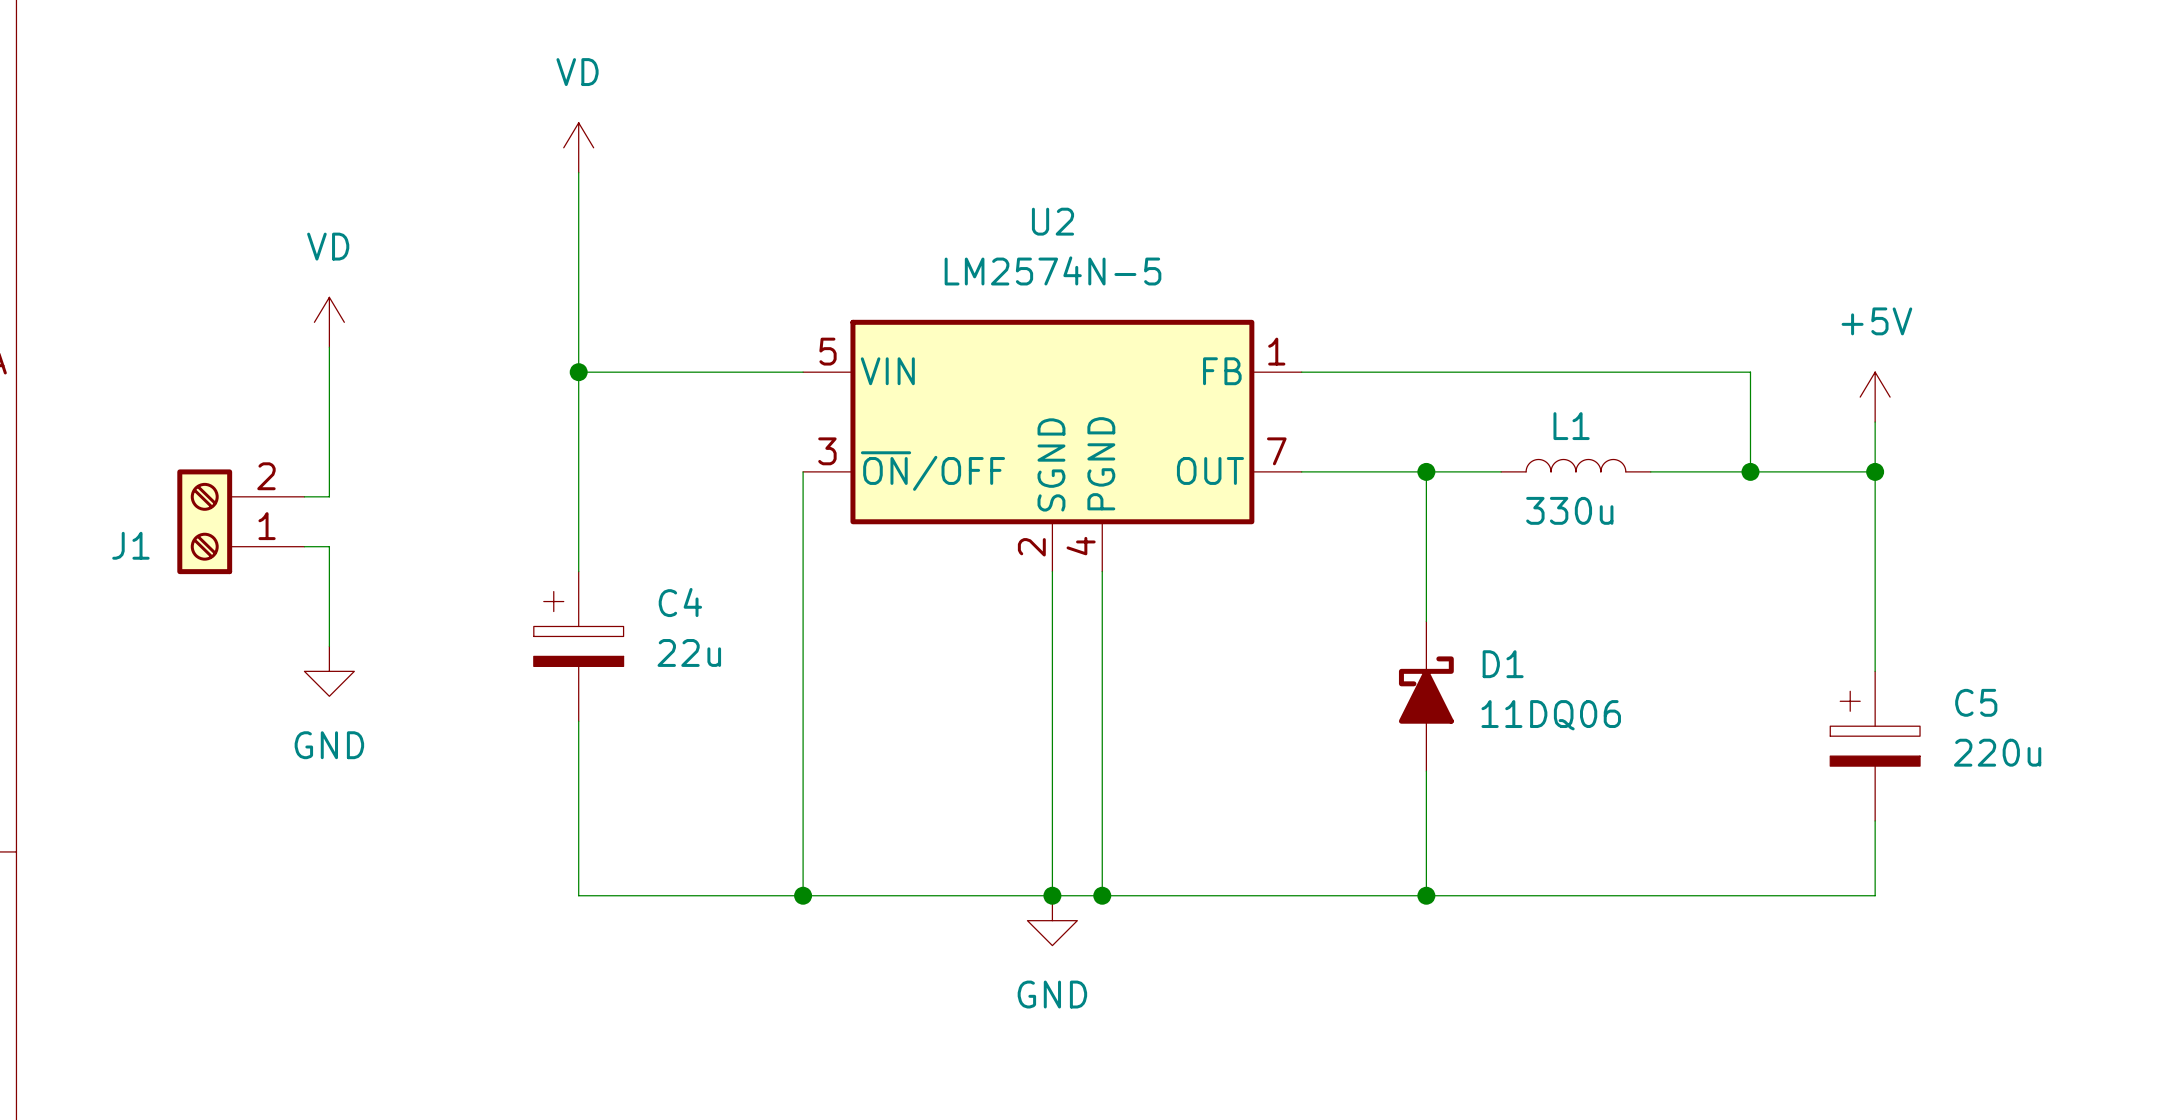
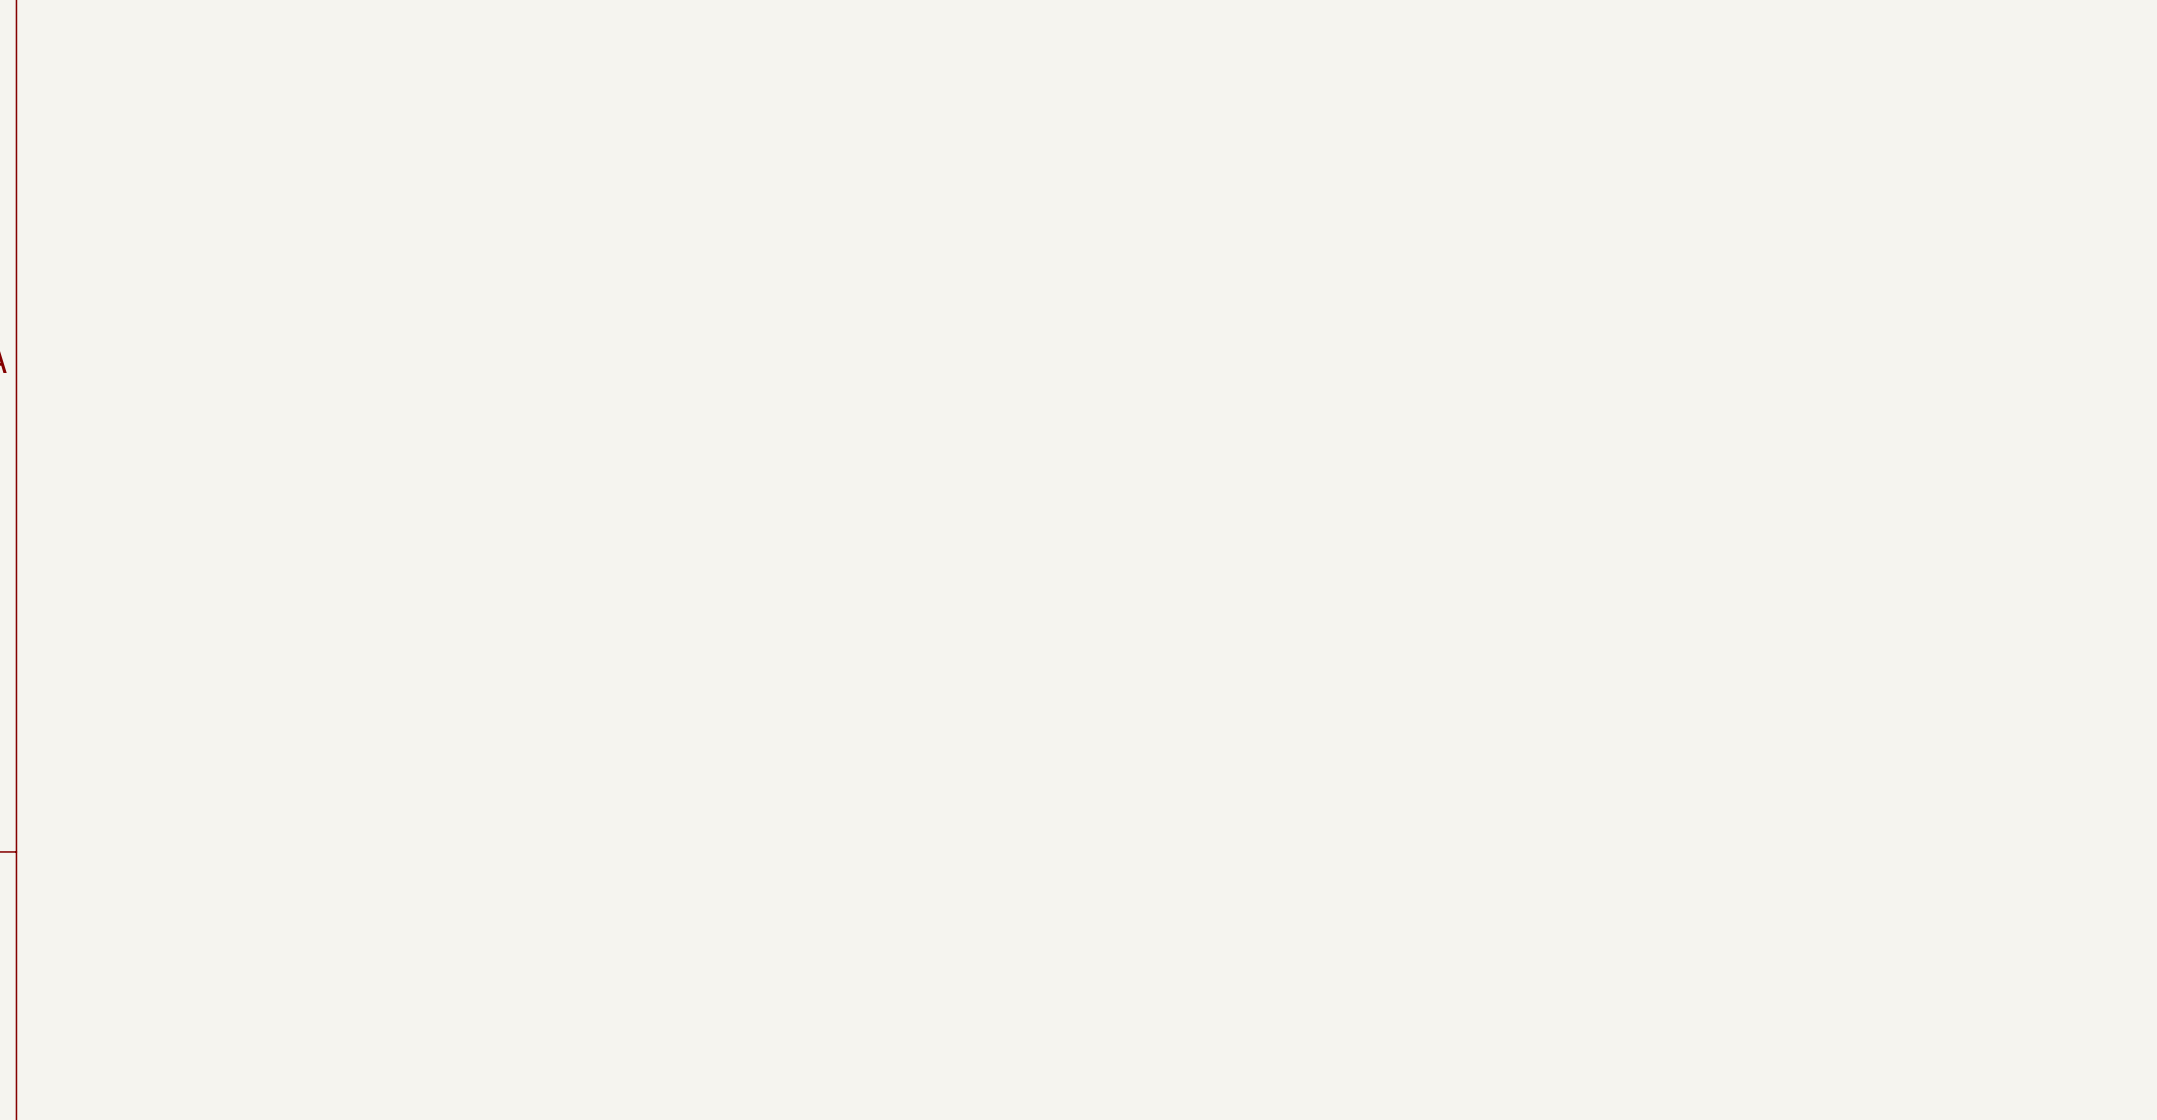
power symbol: VD (578, 147) -> none
wire: (578, 172) (578, 571) -> none
power symbol: VD (329, 322) -> none
wire: (329, 347) (329, 496) (304, 496) -> none
wire: (578, 372) (803, 372) -> none
junction: (578, 372) -> none
wire: (1301, 372) (1750, 372) (1750, 471) -> none
power symbol: +5V (1875, 397) -> none
wire: (1875, 422) (1875, 671) -> none
U2: LM2574N-5 (1052, 445) -> none
L1: 330u (1575, 465) -> none
wire: (803, 471) (803, 895) -> none
wire: (1301, 471) (1501, 471) -> none
wire: (1426, 471) (1426, 621) -> none
junction: (1426, 471) -> none
wire: (1650, 471) (1875, 471) -> none
junction: (1750, 471) -> none
junction: (1875, 471) -> none
J1: (240, 521) -> none
wire: (304, 546) (329, 546) (329, 646) -> none
wire: (1052, 571) (1052, 895) -> none
wire: (1102, 571) (1102, 895) -> none
C4: 22u (578, 646) -> none
power symbol: GND (329, 671) -> none
D1: 11DQ06 (1426, 696) -> none
wire: (578, 721) (578, 895) (1875, 895) (1875, 820) -> none
C5: 220u (1875, 746) -> none
wire: (1426, 771) (1426, 895) -> none
junction: (803, 895) -> none
junction: (1052, 895) -> none
junction: (1102, 895) -> none
junction: (1426, 895) -> none
power symbol: GND (1052, 920) -> none

